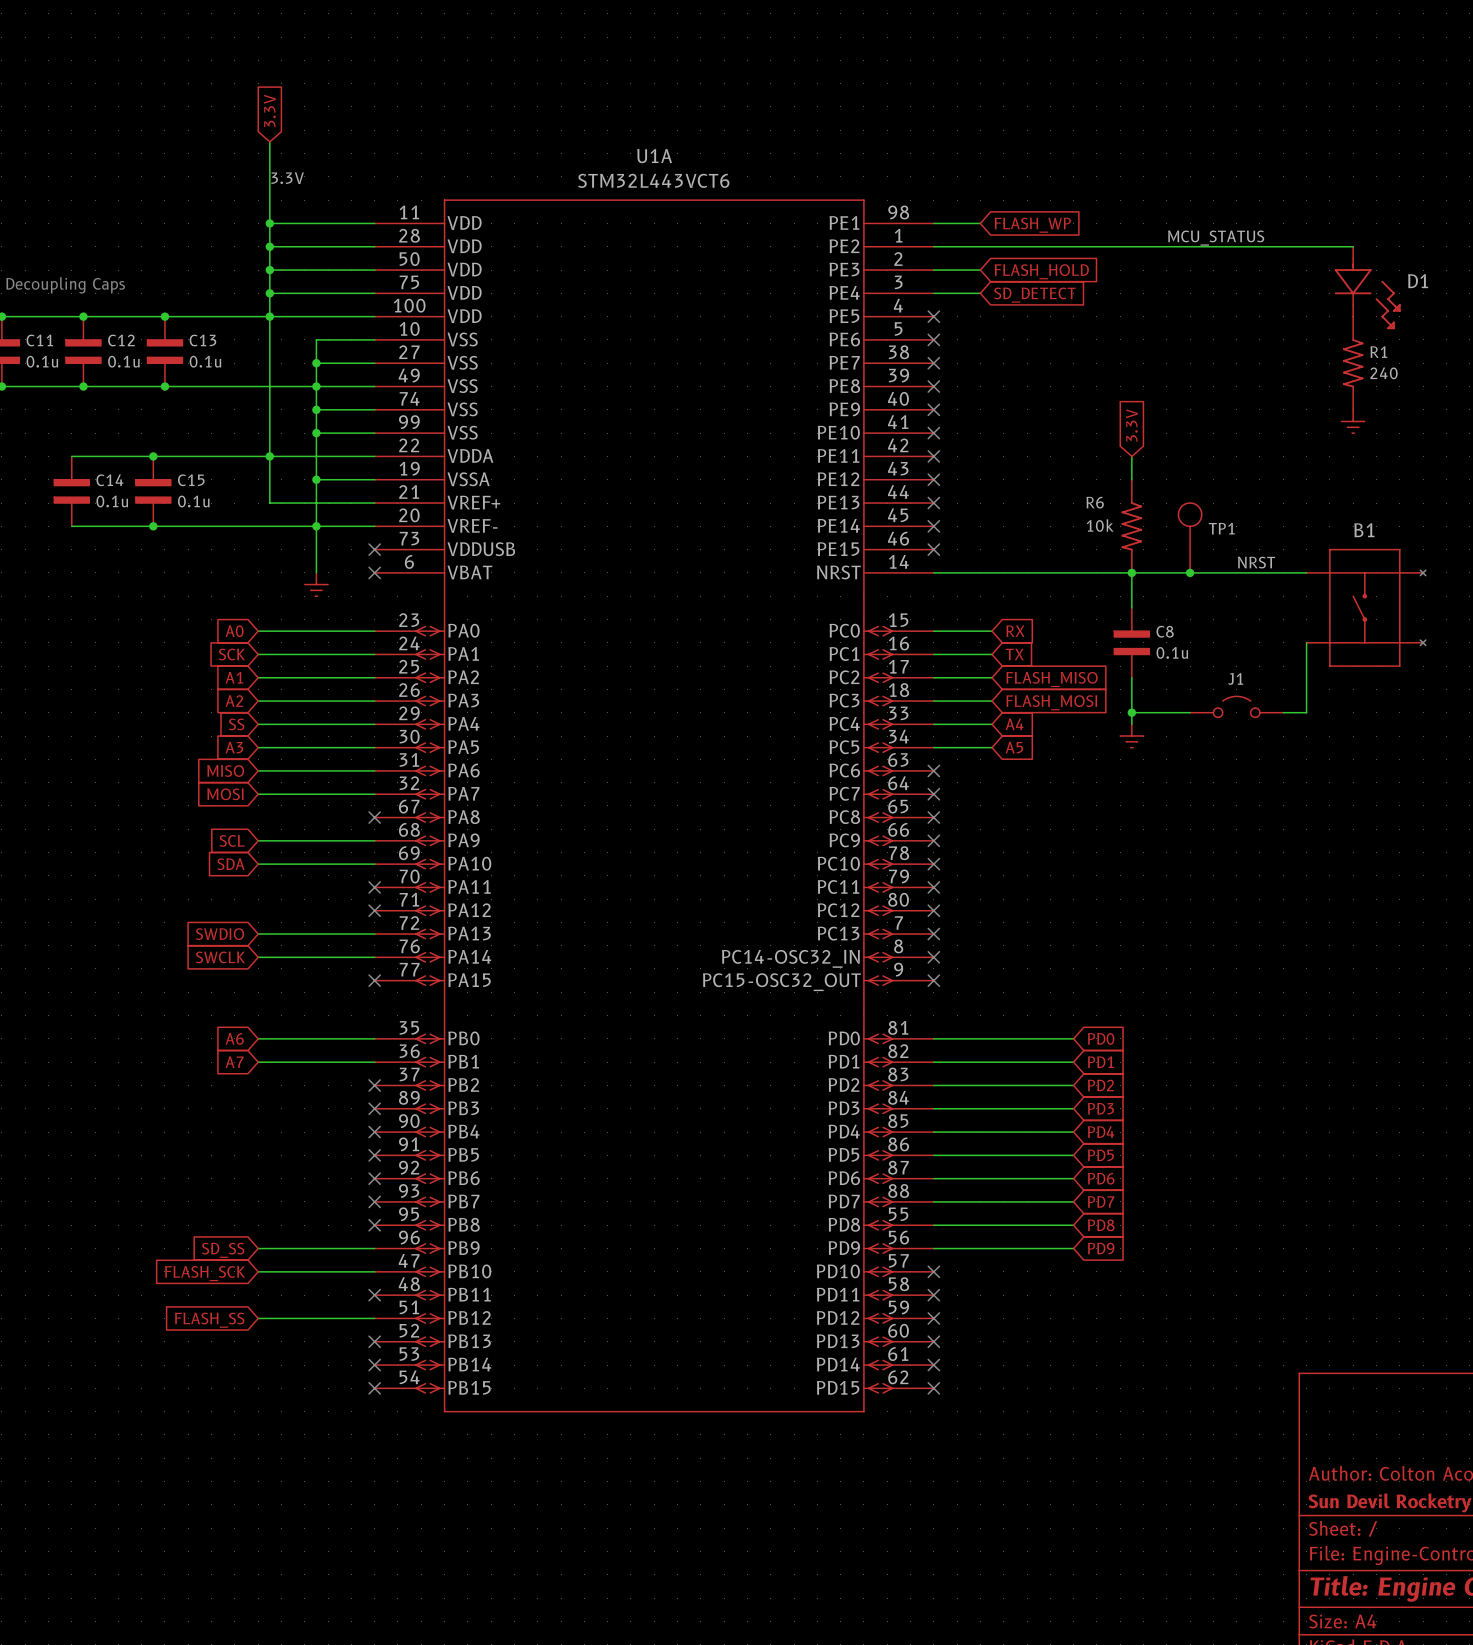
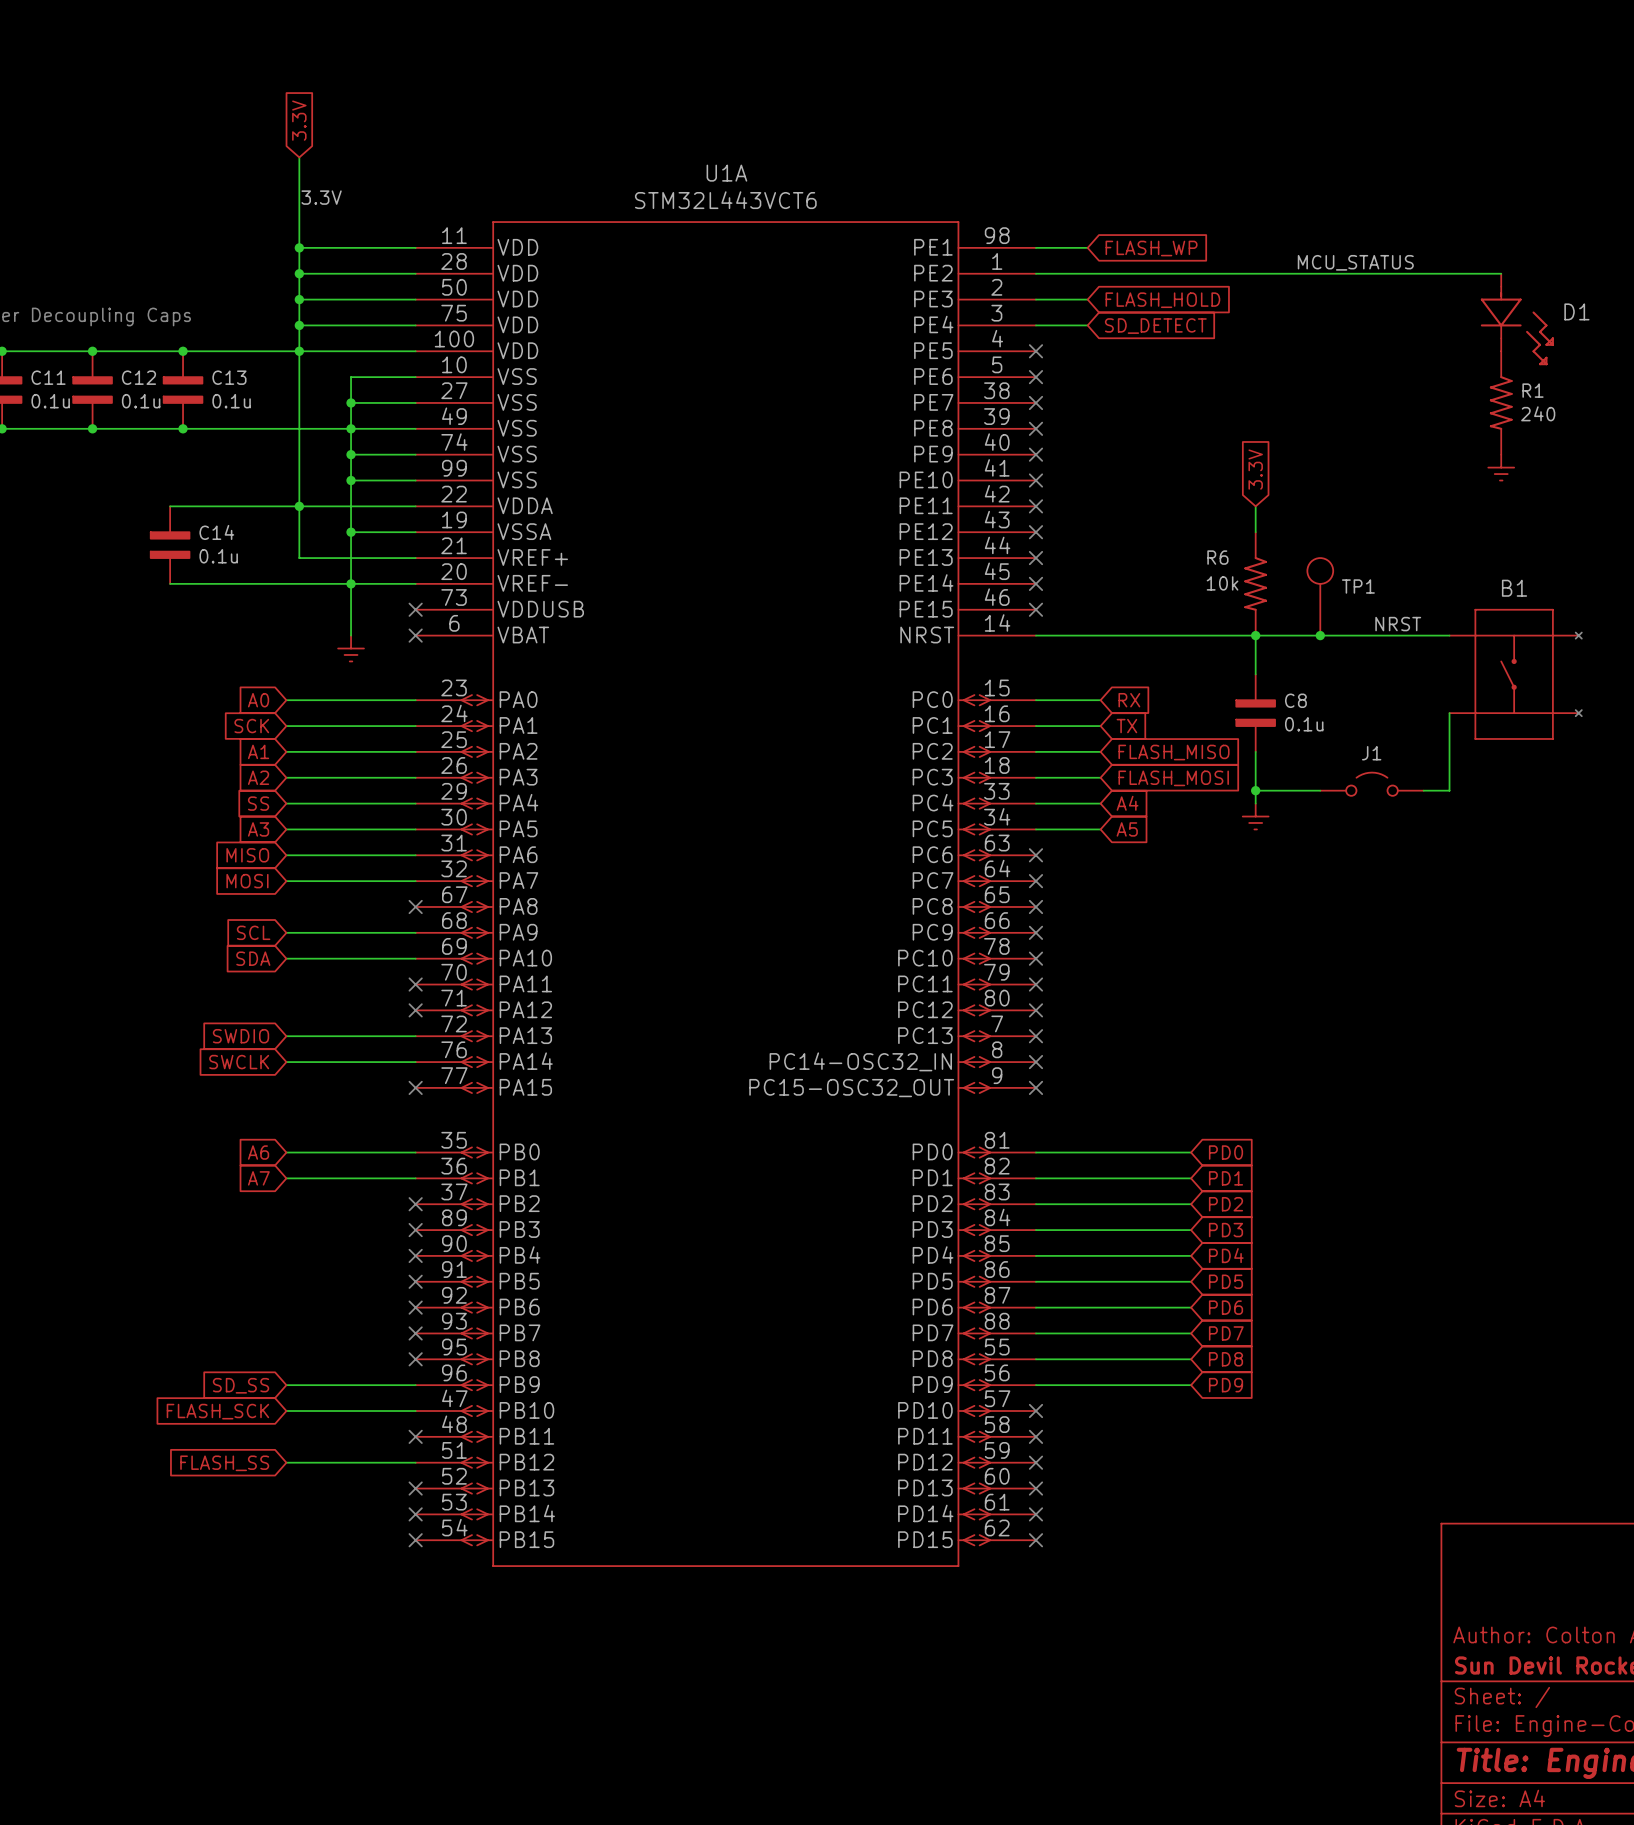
wire: (71, 456) (153, 456) -> none
junction: (153, 456) -> none
C15 name: C15 (191, 480) -> C14 (216, 532)
C14: 0.1u (71, 491) -> none
wire: (71, 526) (153, 526) -> none
junction: (153, 526) -> none

